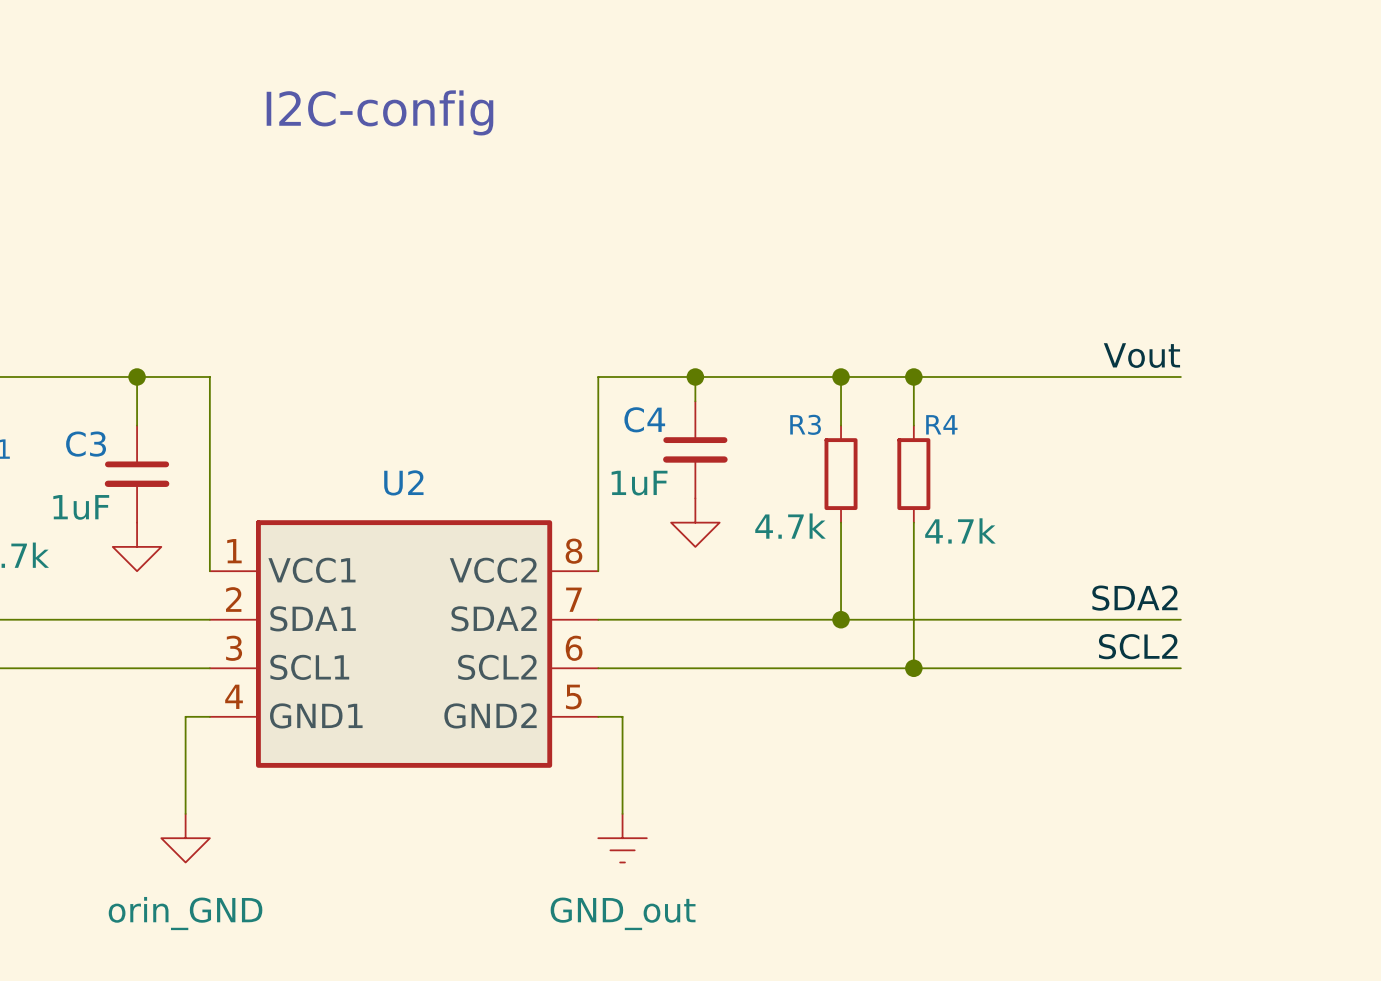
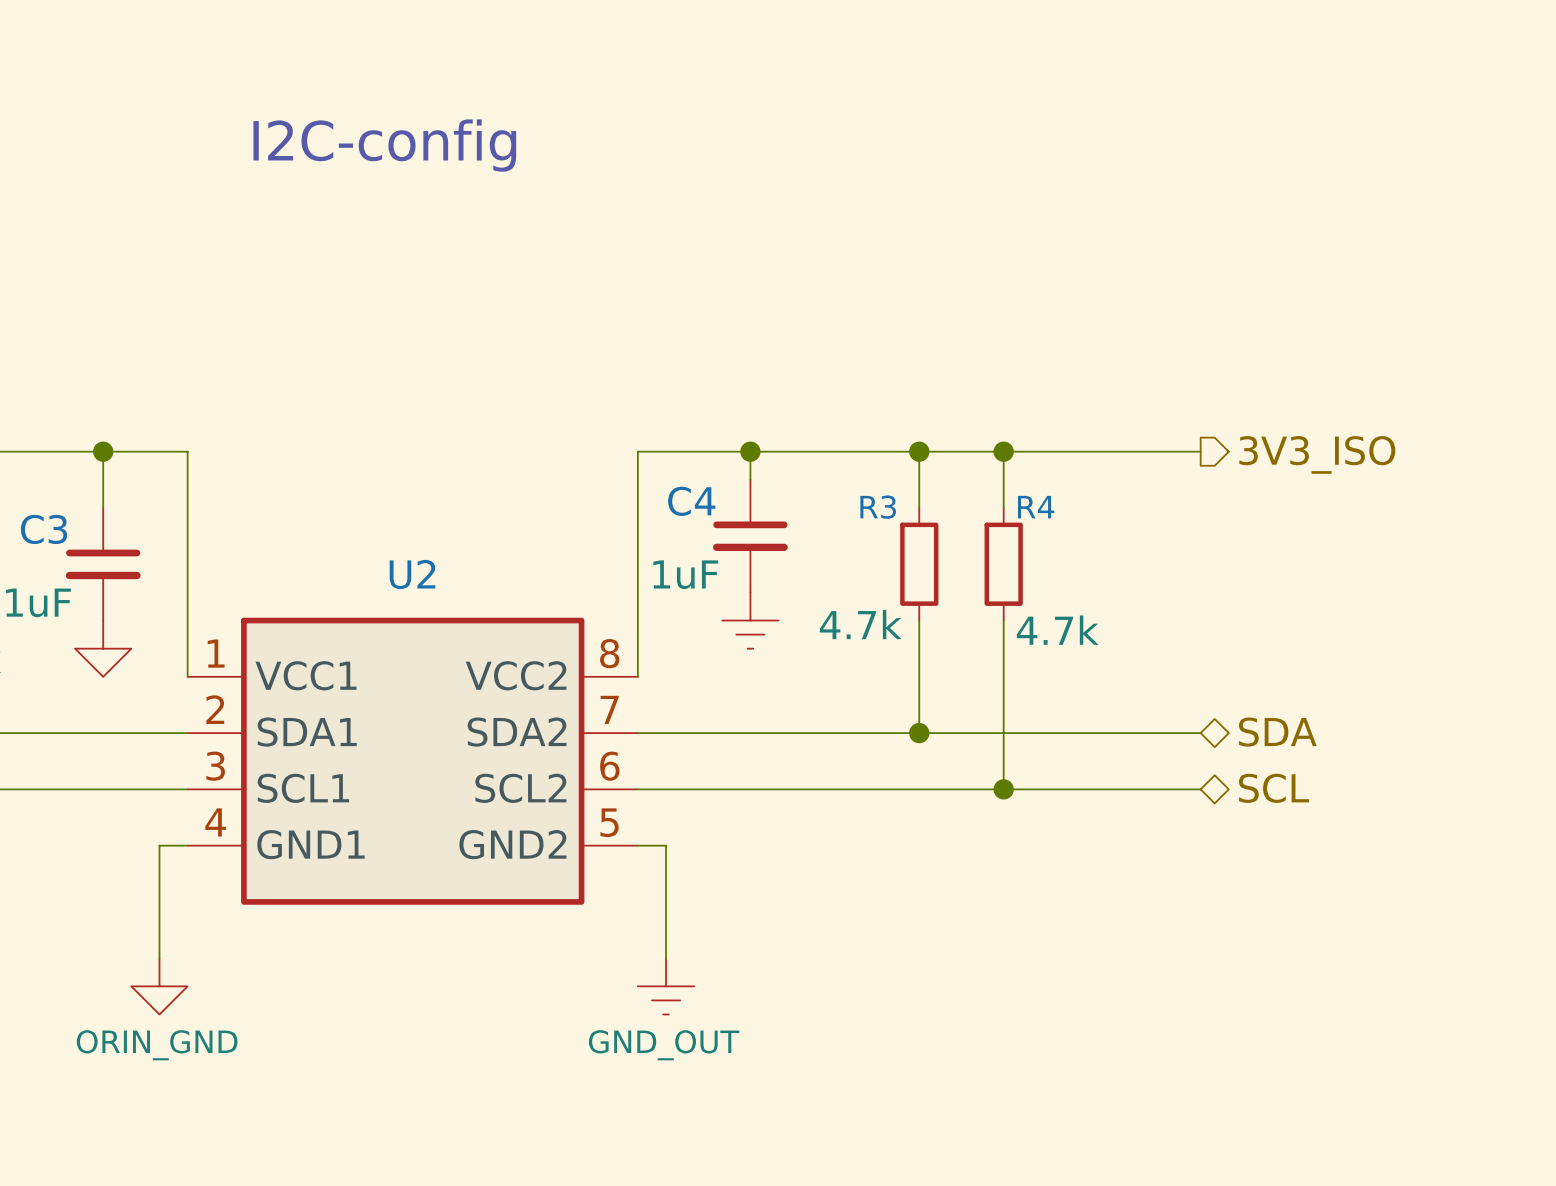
label: Vout (1141, 355) -> none
wire: (1083, 376) (1180, 376) -> none
hierarchical label: none -> 3V3_ISO (1317, 454)
power symbol shape: [671, 498, 720, 547] -> [722, 592, 779, 649]
label: SDA2 (1134, 598) -> none
hierarchical label: none -> SDA (1277, 732)
wire: (1083, 619) (1180, 619) -> none
label: SCL2 (1138, 646) -> none
hierarchical label: none -> SCL (1274, 788)
wire: (1083, 668) (1180, 668) -> none
power symbol: orin_GND (185, 838) -> ORIN_GND (159, 986)
power symbol: GND_out (622, 838) -> GND_OUT (666, 986)

